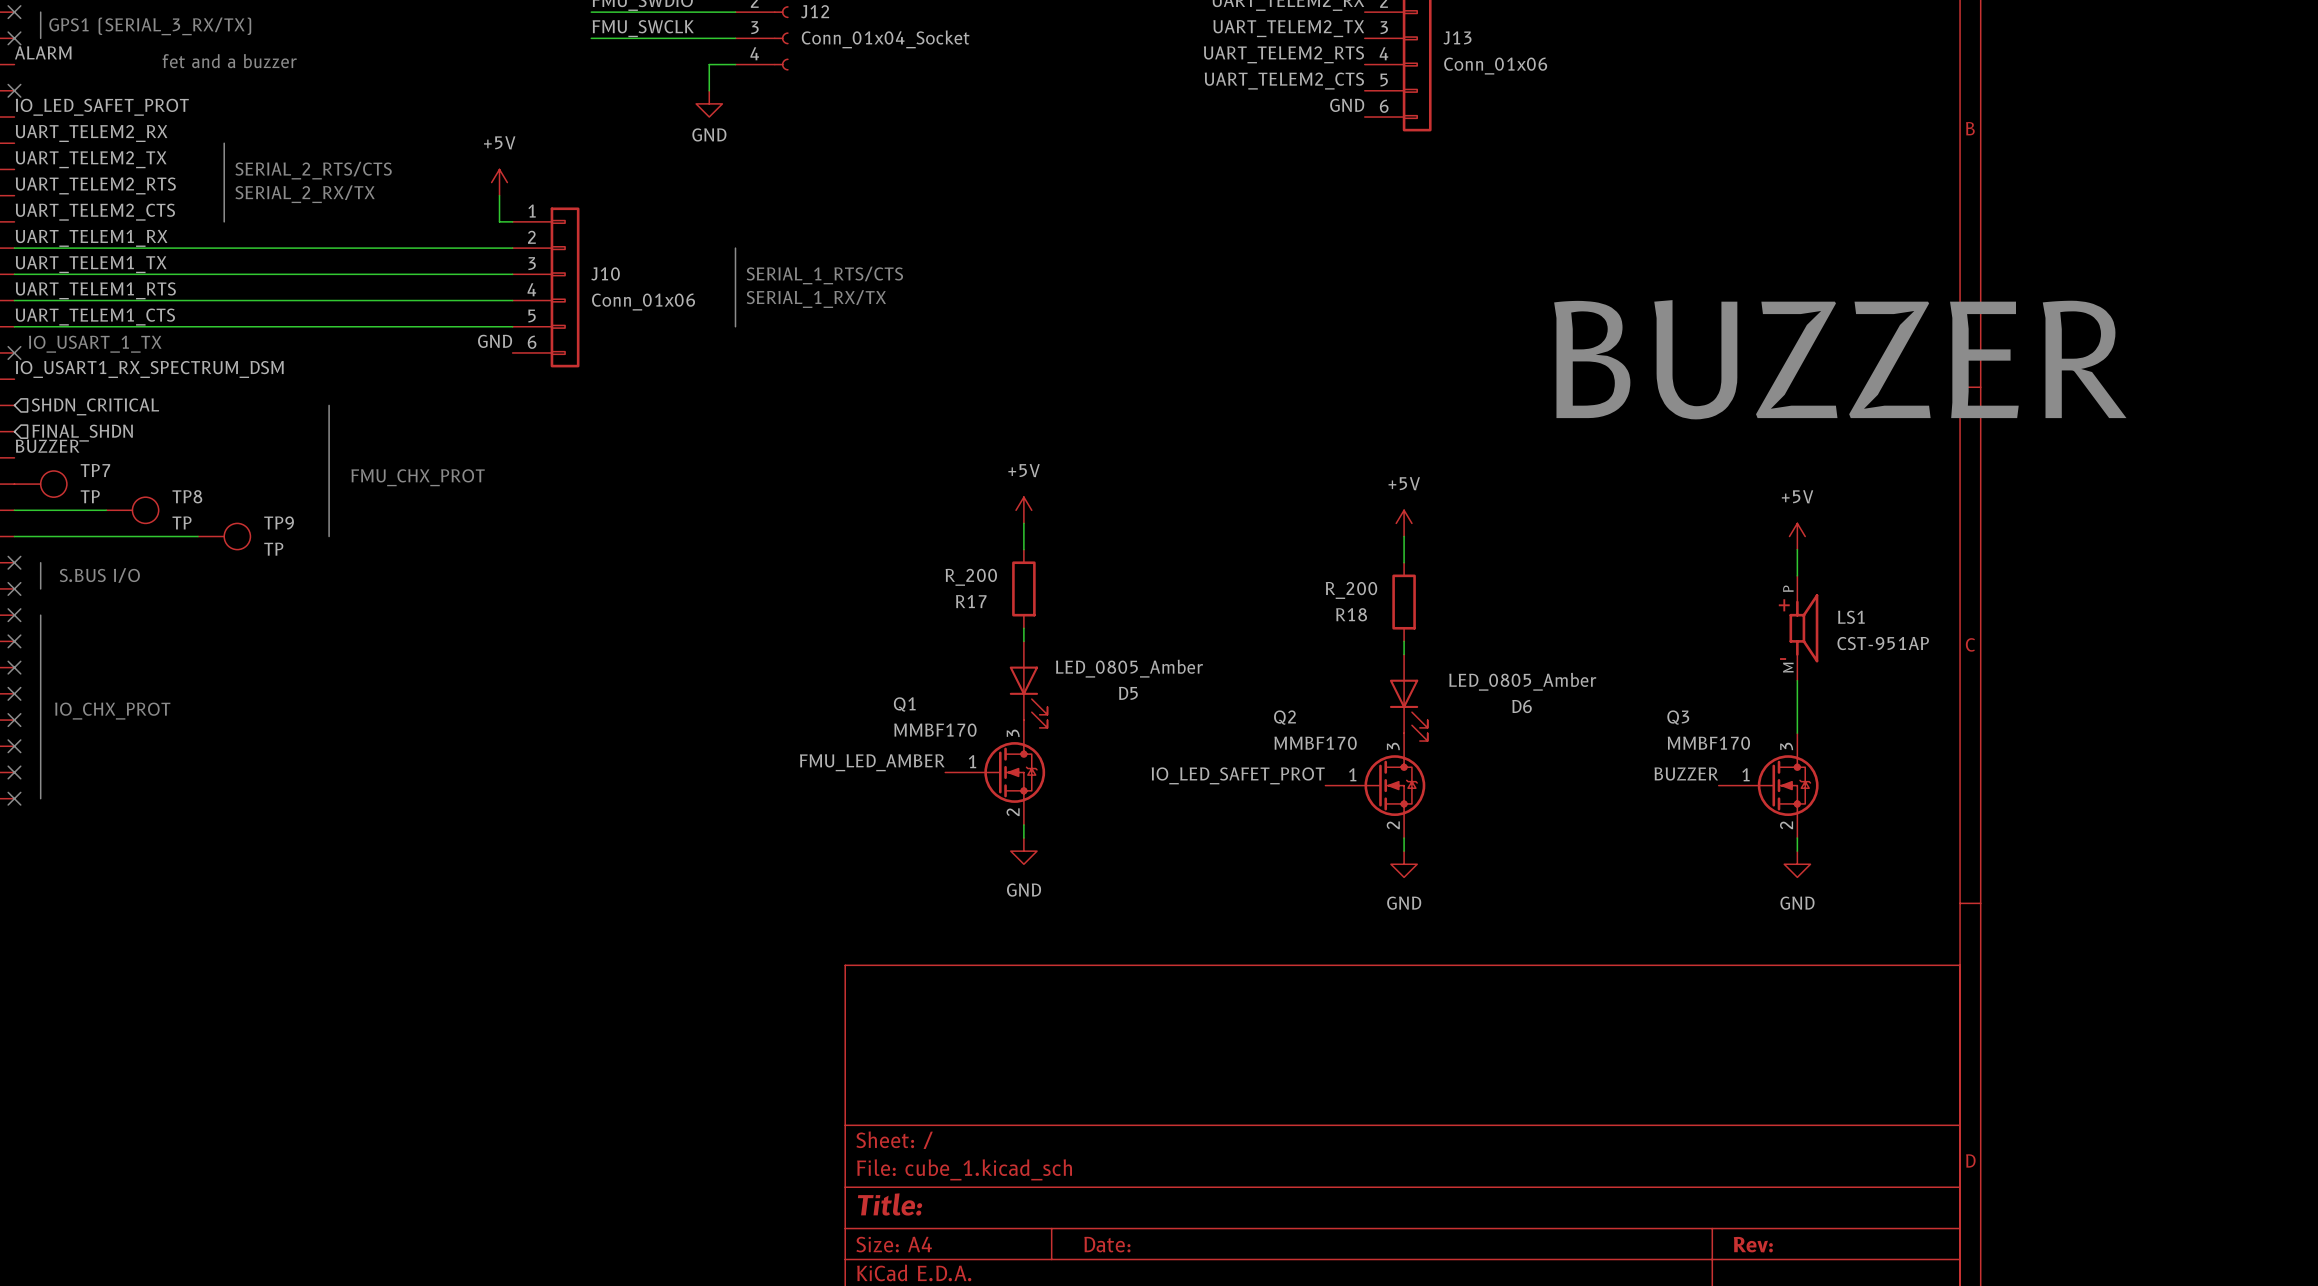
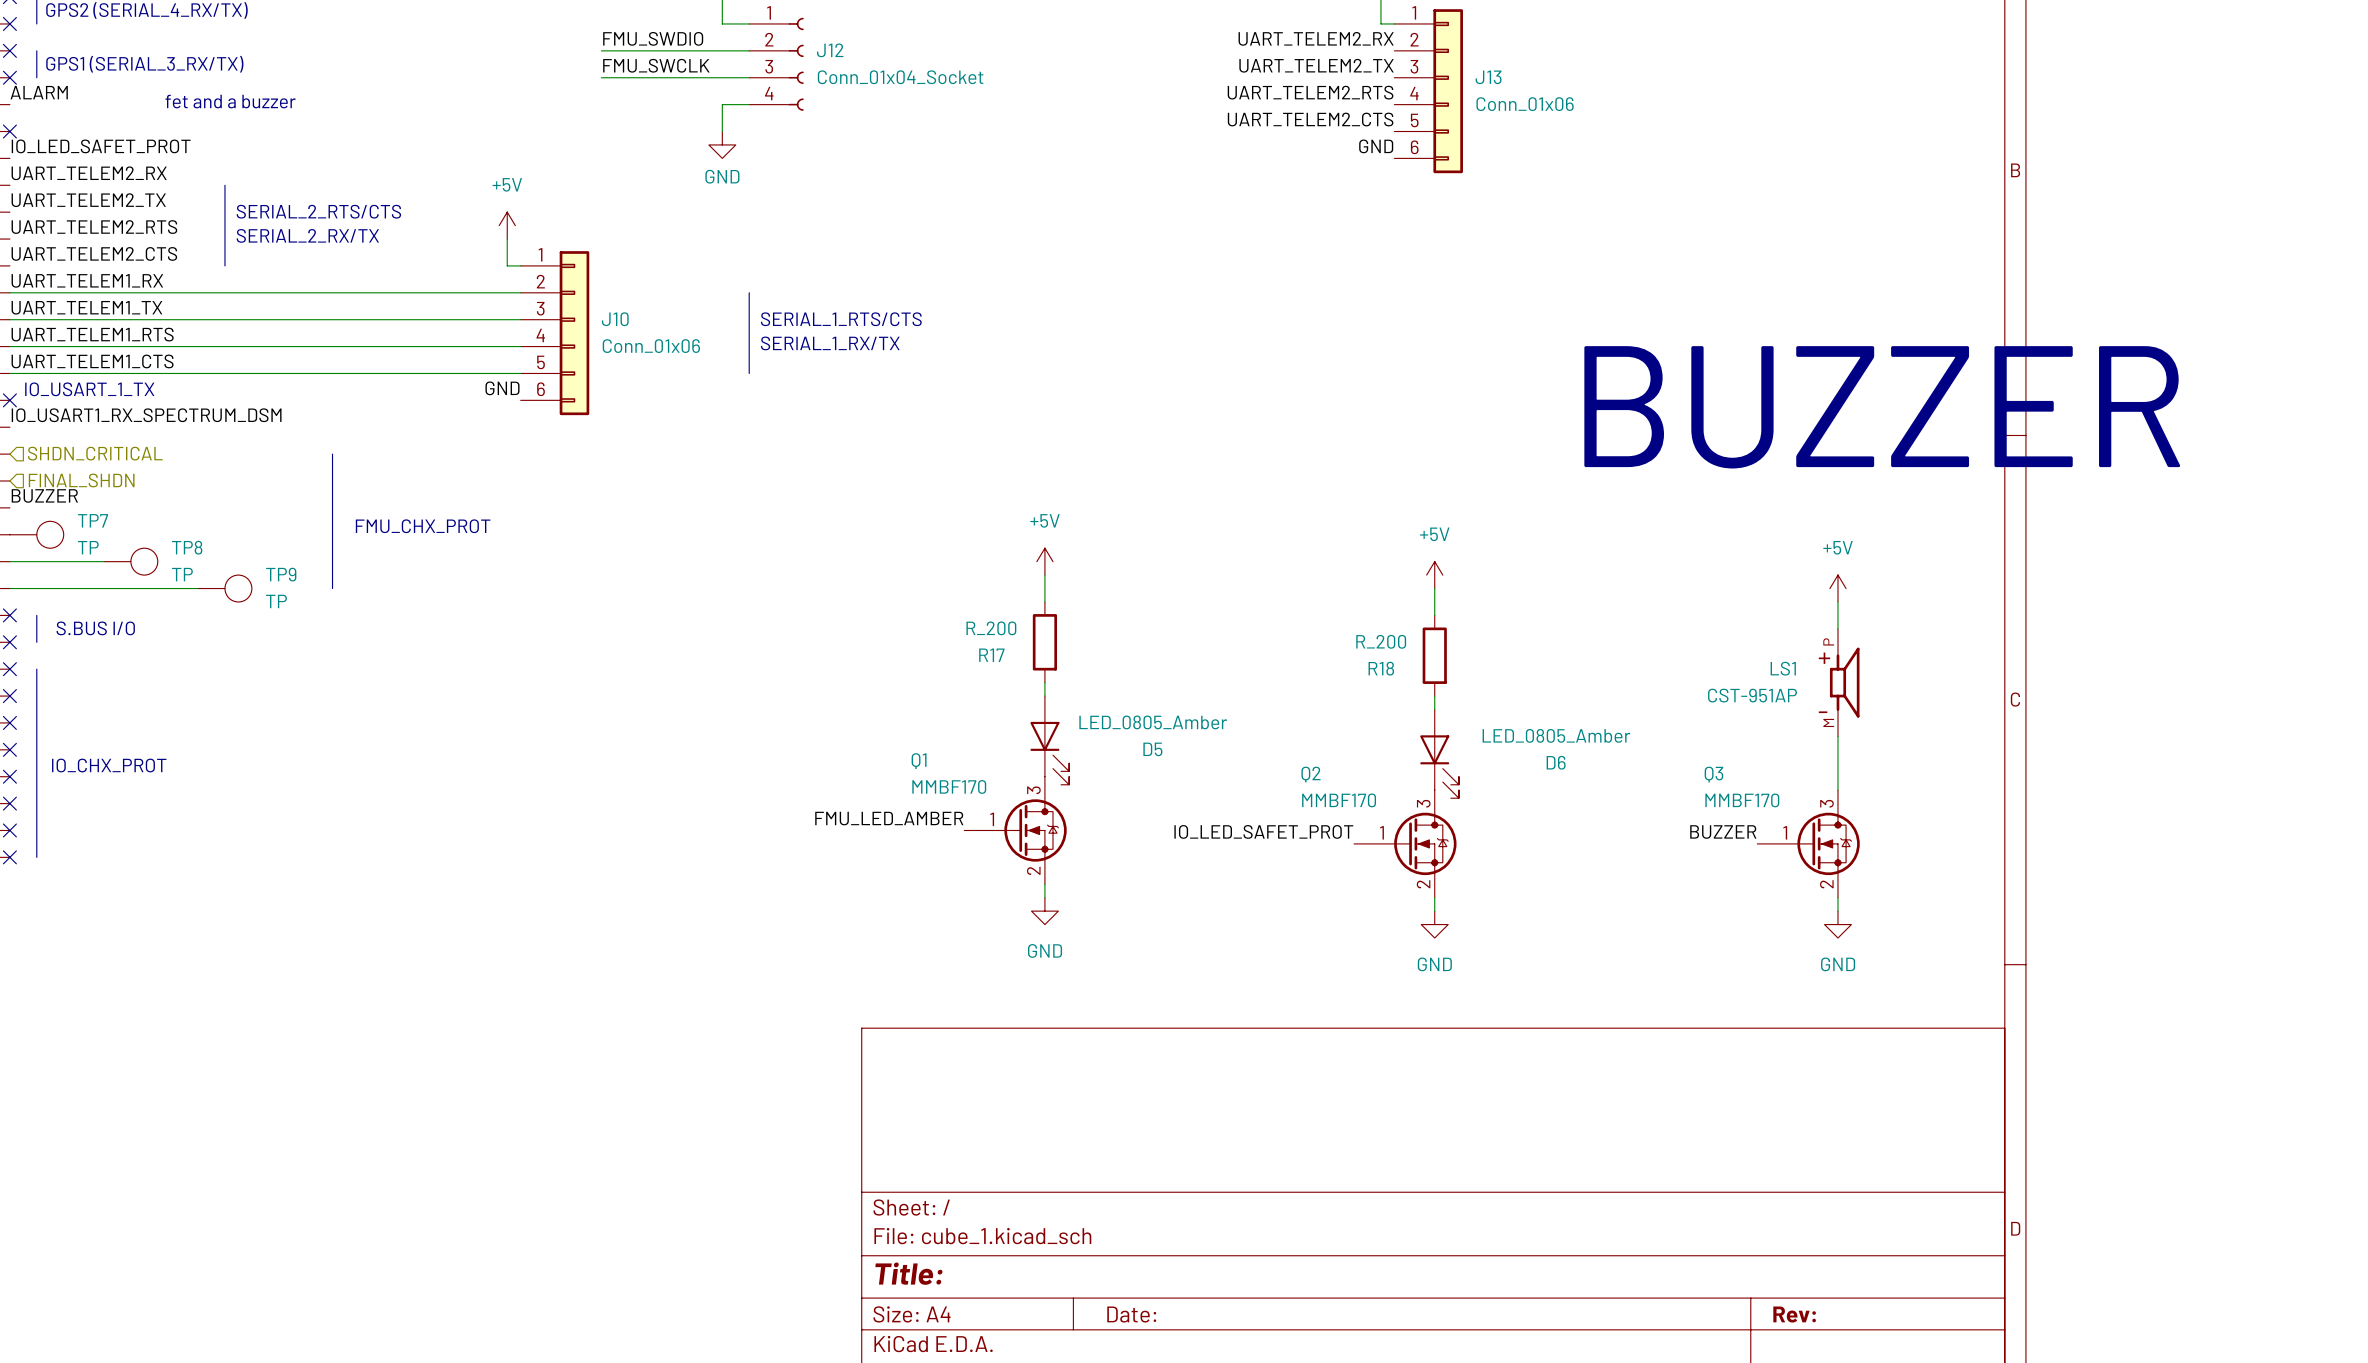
LS1 name position: LS1 (1851, 617) -> LS1 (1783, 668)
LS1 value position: CST-951AP (1883, 643) -> CST-951AP (1752, 695)

